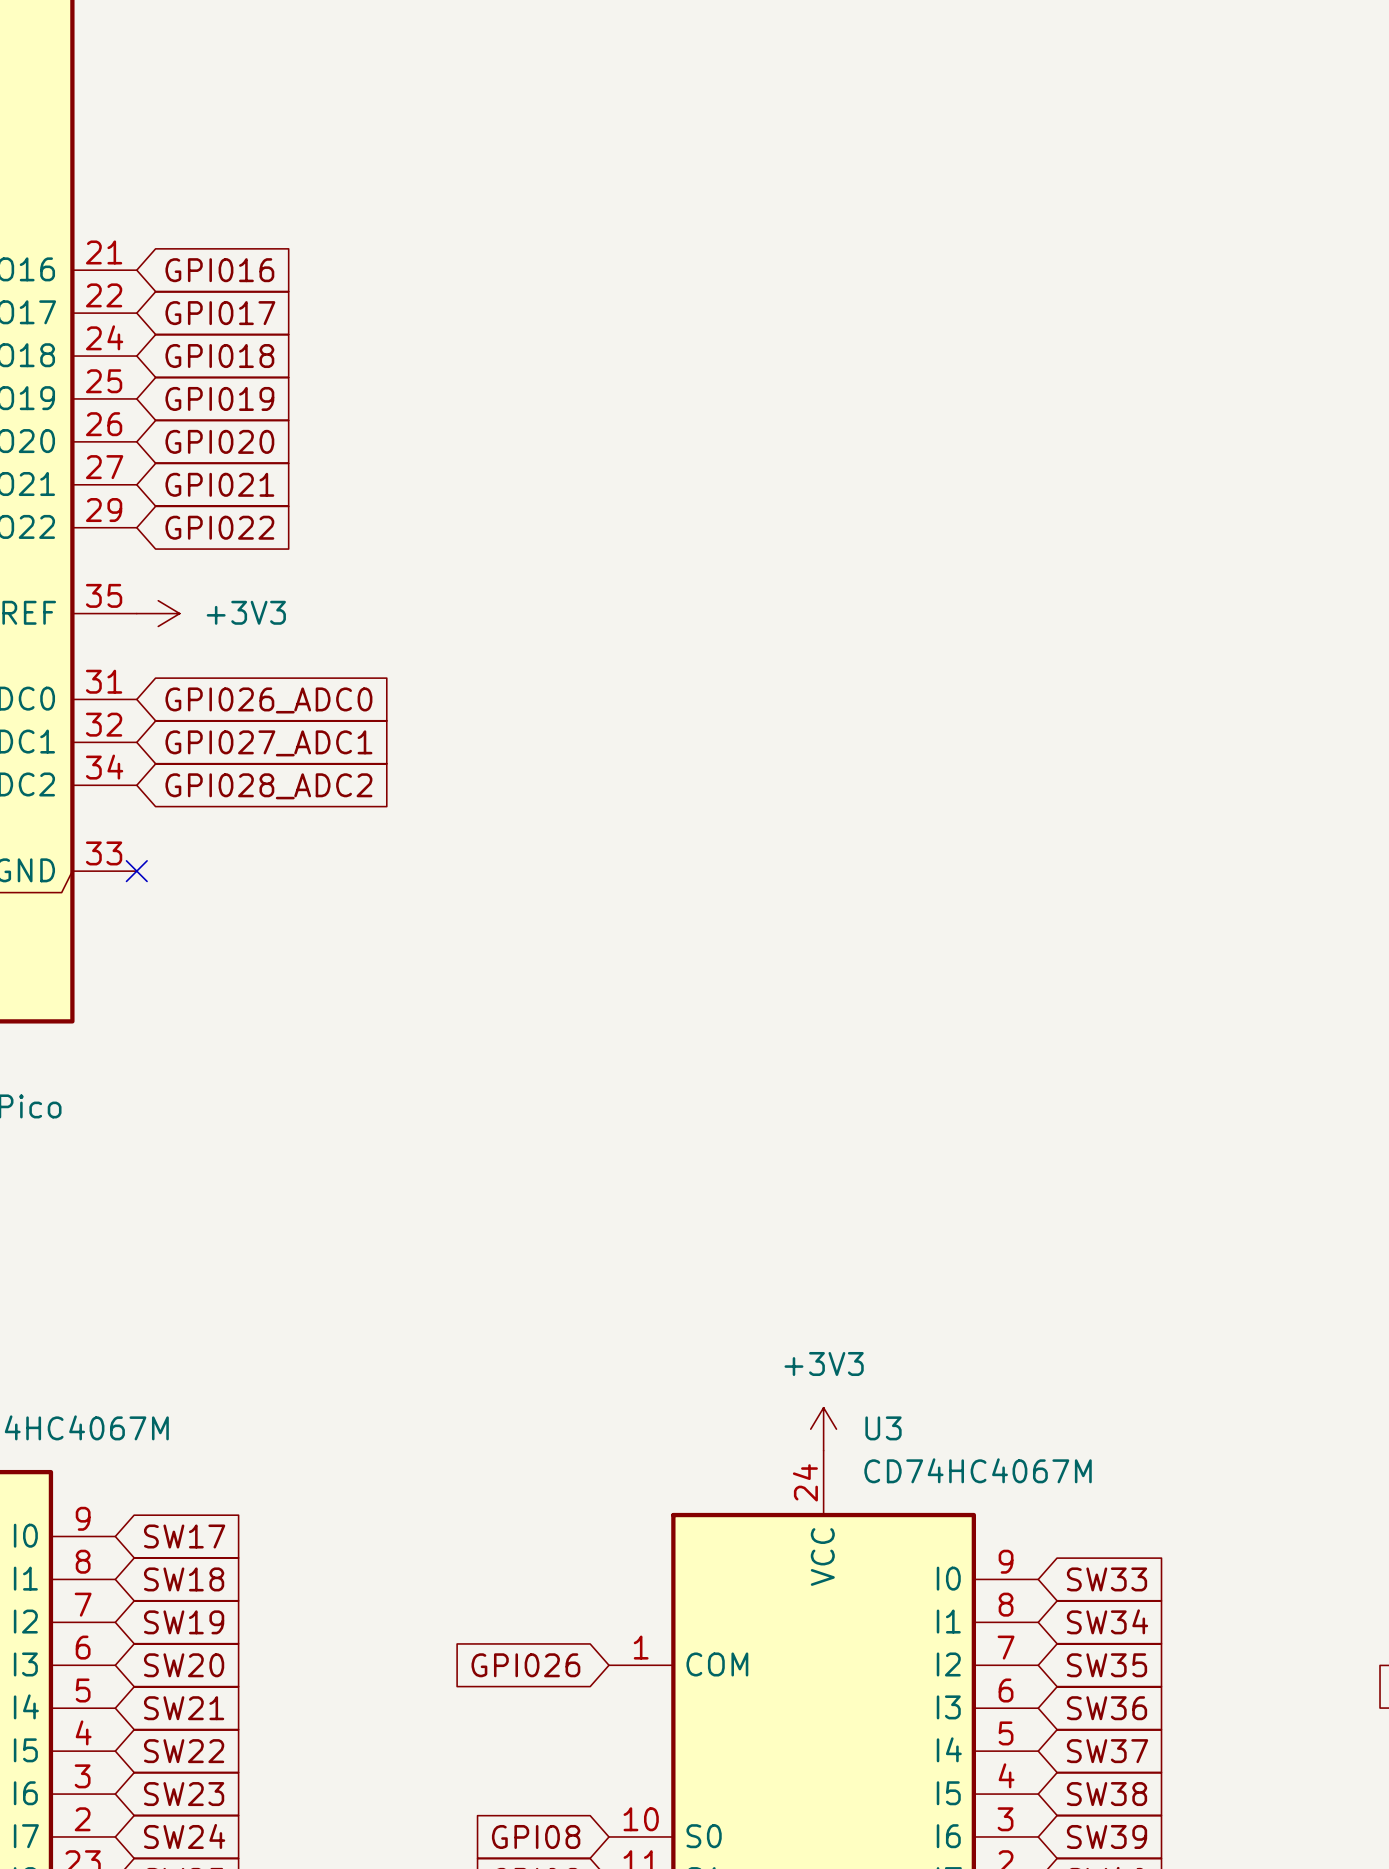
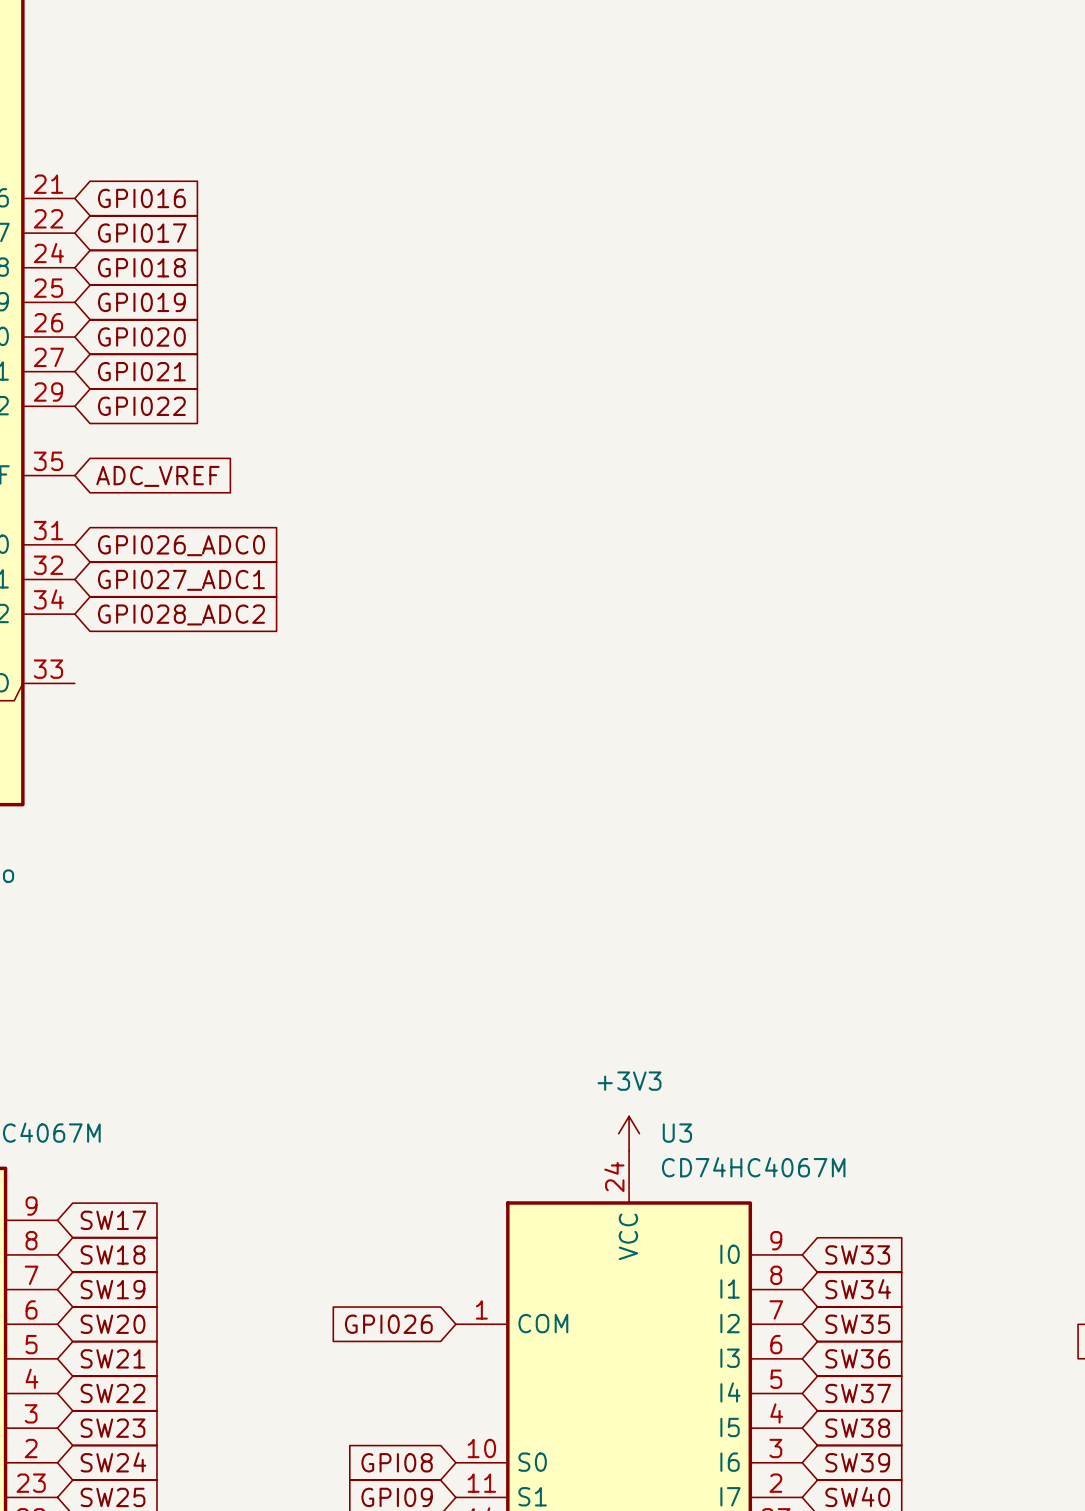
power symbol: +3V3 (158, 613) -> none
global label: none -> ADC_VREF (157, 476)
no-connect mark: (136, 871) -> none

